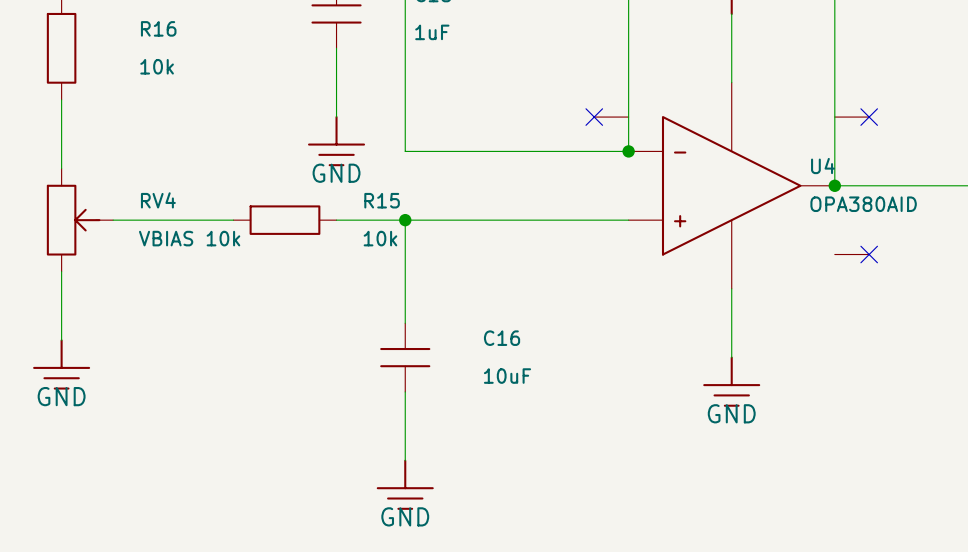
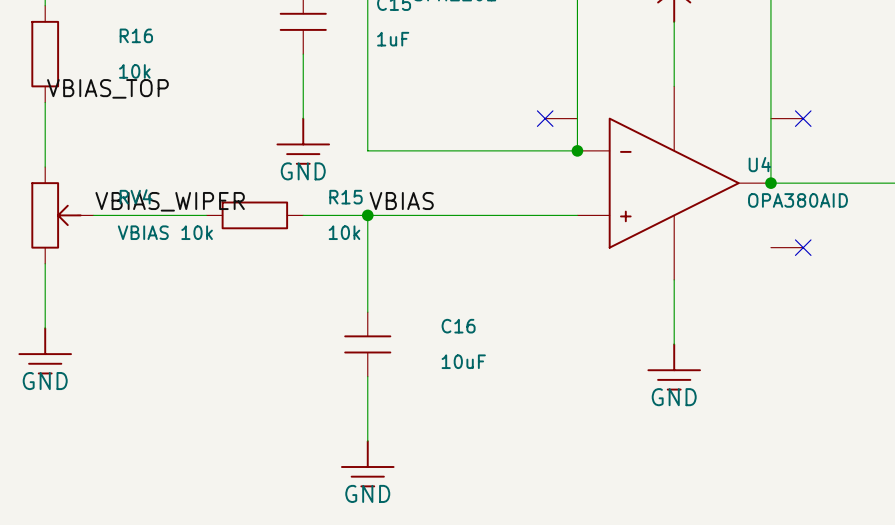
label: none -> VBIAS_TOP (107, 88)
label: none -> VBIAS (401, 201)
label: none -> VBIAS_WIPER (170, 201)

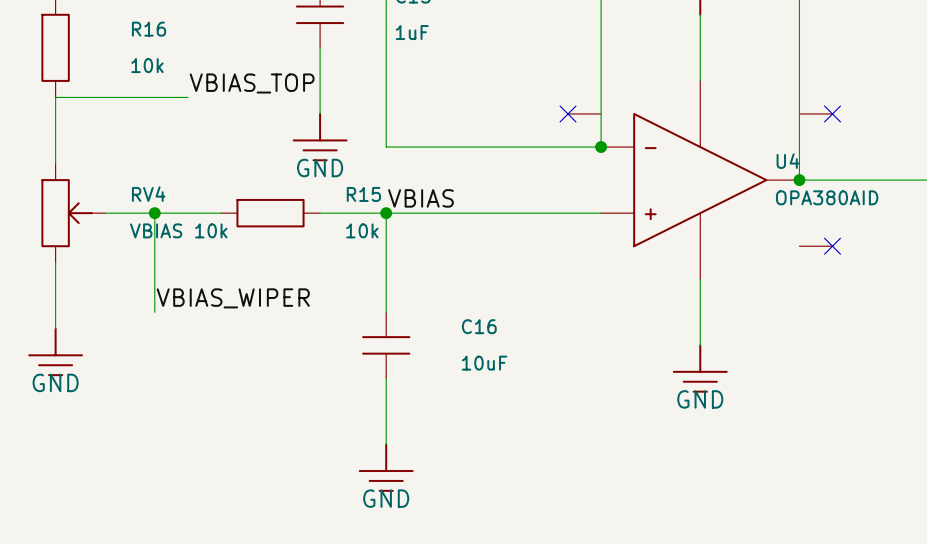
label position: VBIAS_TOP (107, 88) -> VBIAS_TOP (252, 83)
wire: none -> (55, 97) (187, 97)
label position: VBIAS_WIPER (170, 201) -> VBIAS_WIPER (233, 298)
wire: none -> (154, 213) (154, 312)
junction: none -> (154, 213)

